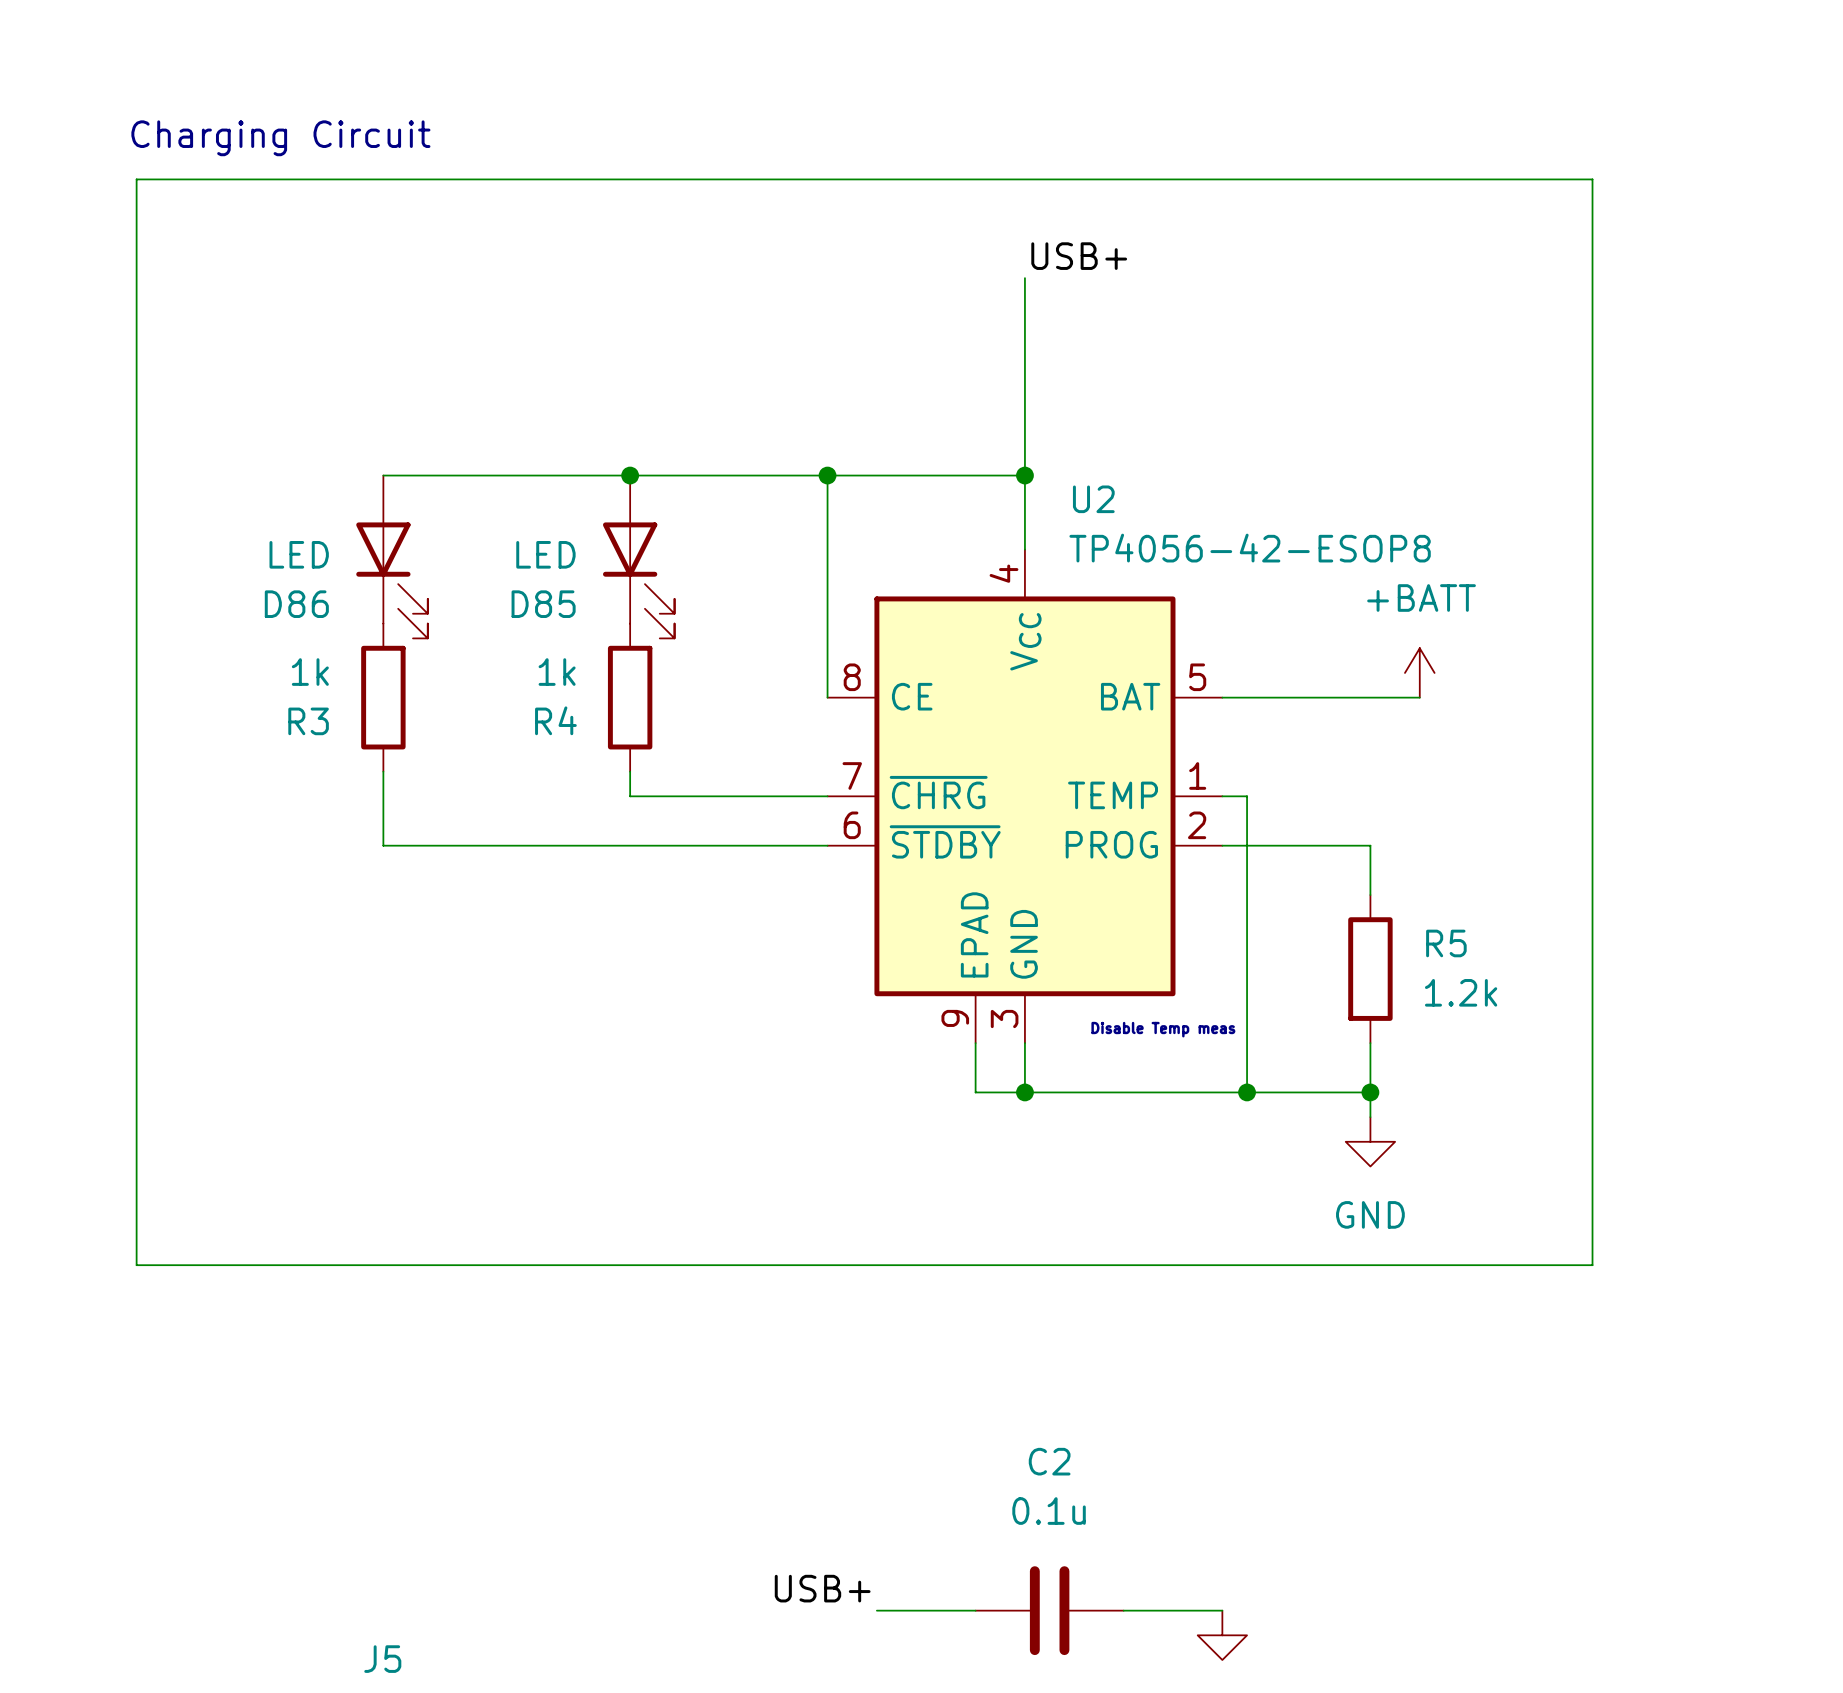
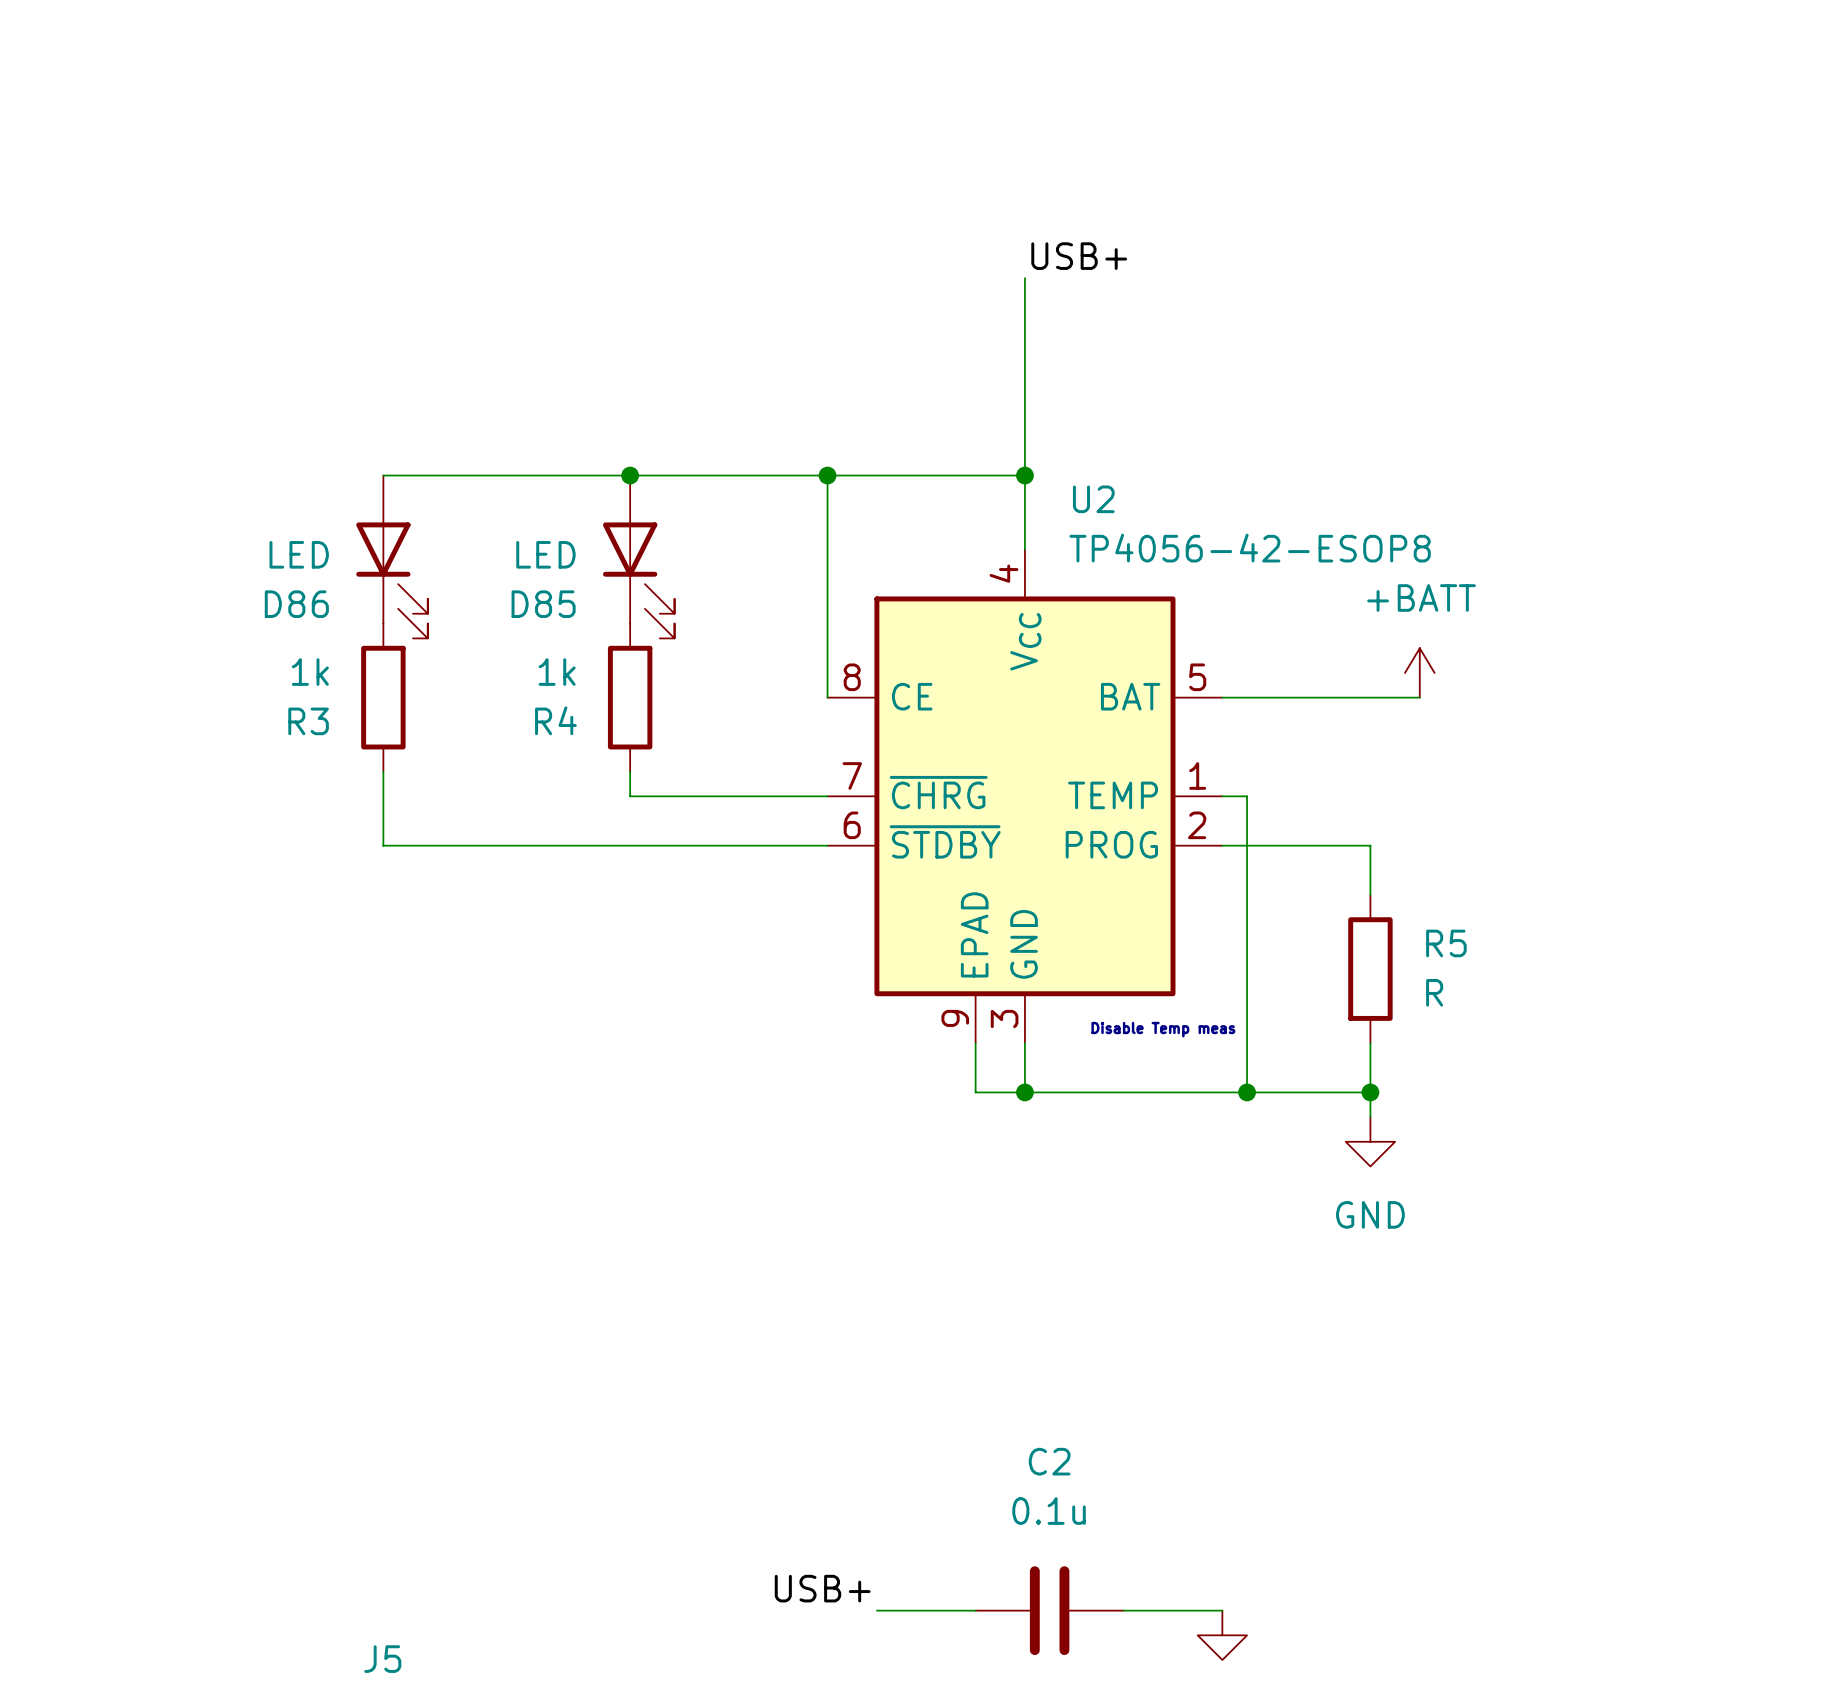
text: Charging Circuit (280, 138) -> none
wire: (136, 179) (136, 1265) (1592, 1265) (1592, 179) (136, 179) -> none
R5 value: 1.2k (1461, 992) -> R (1434, 992)

